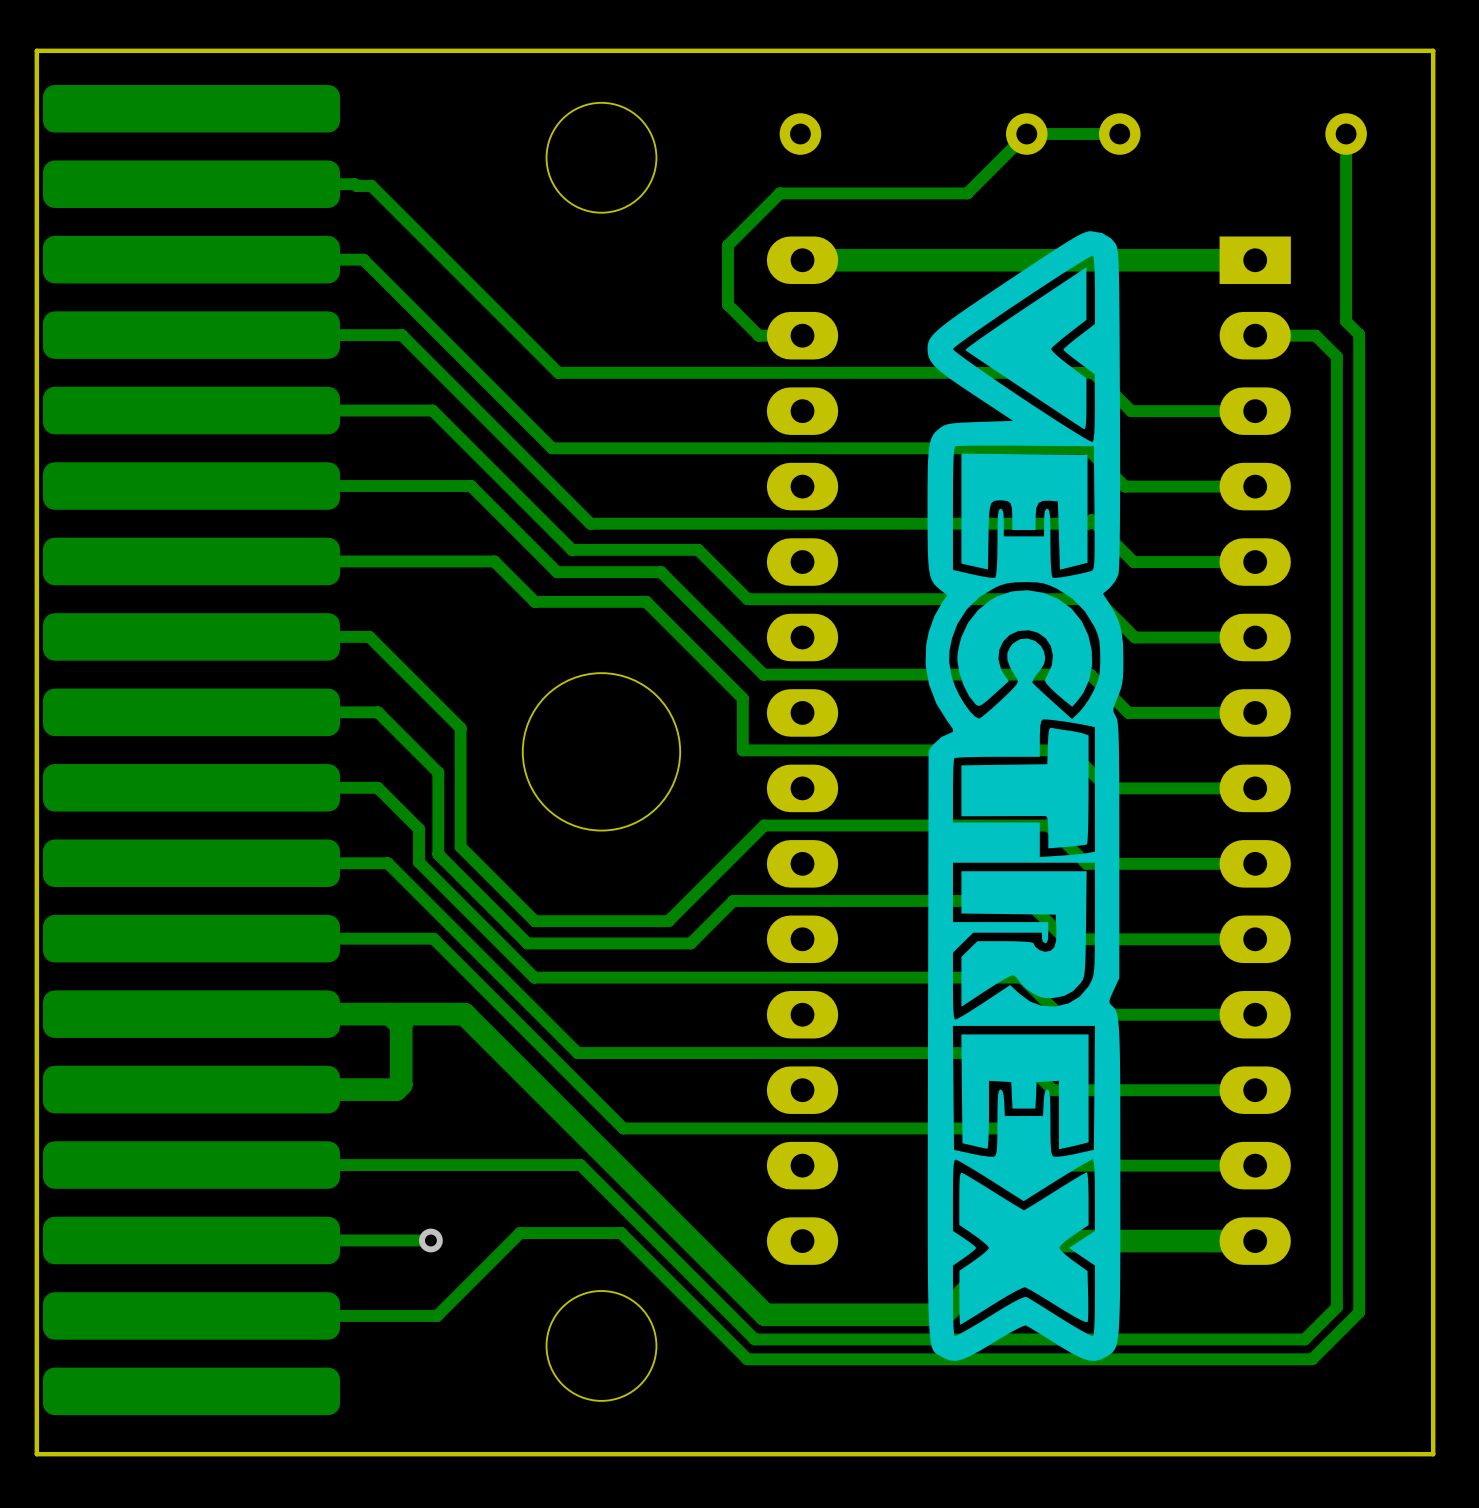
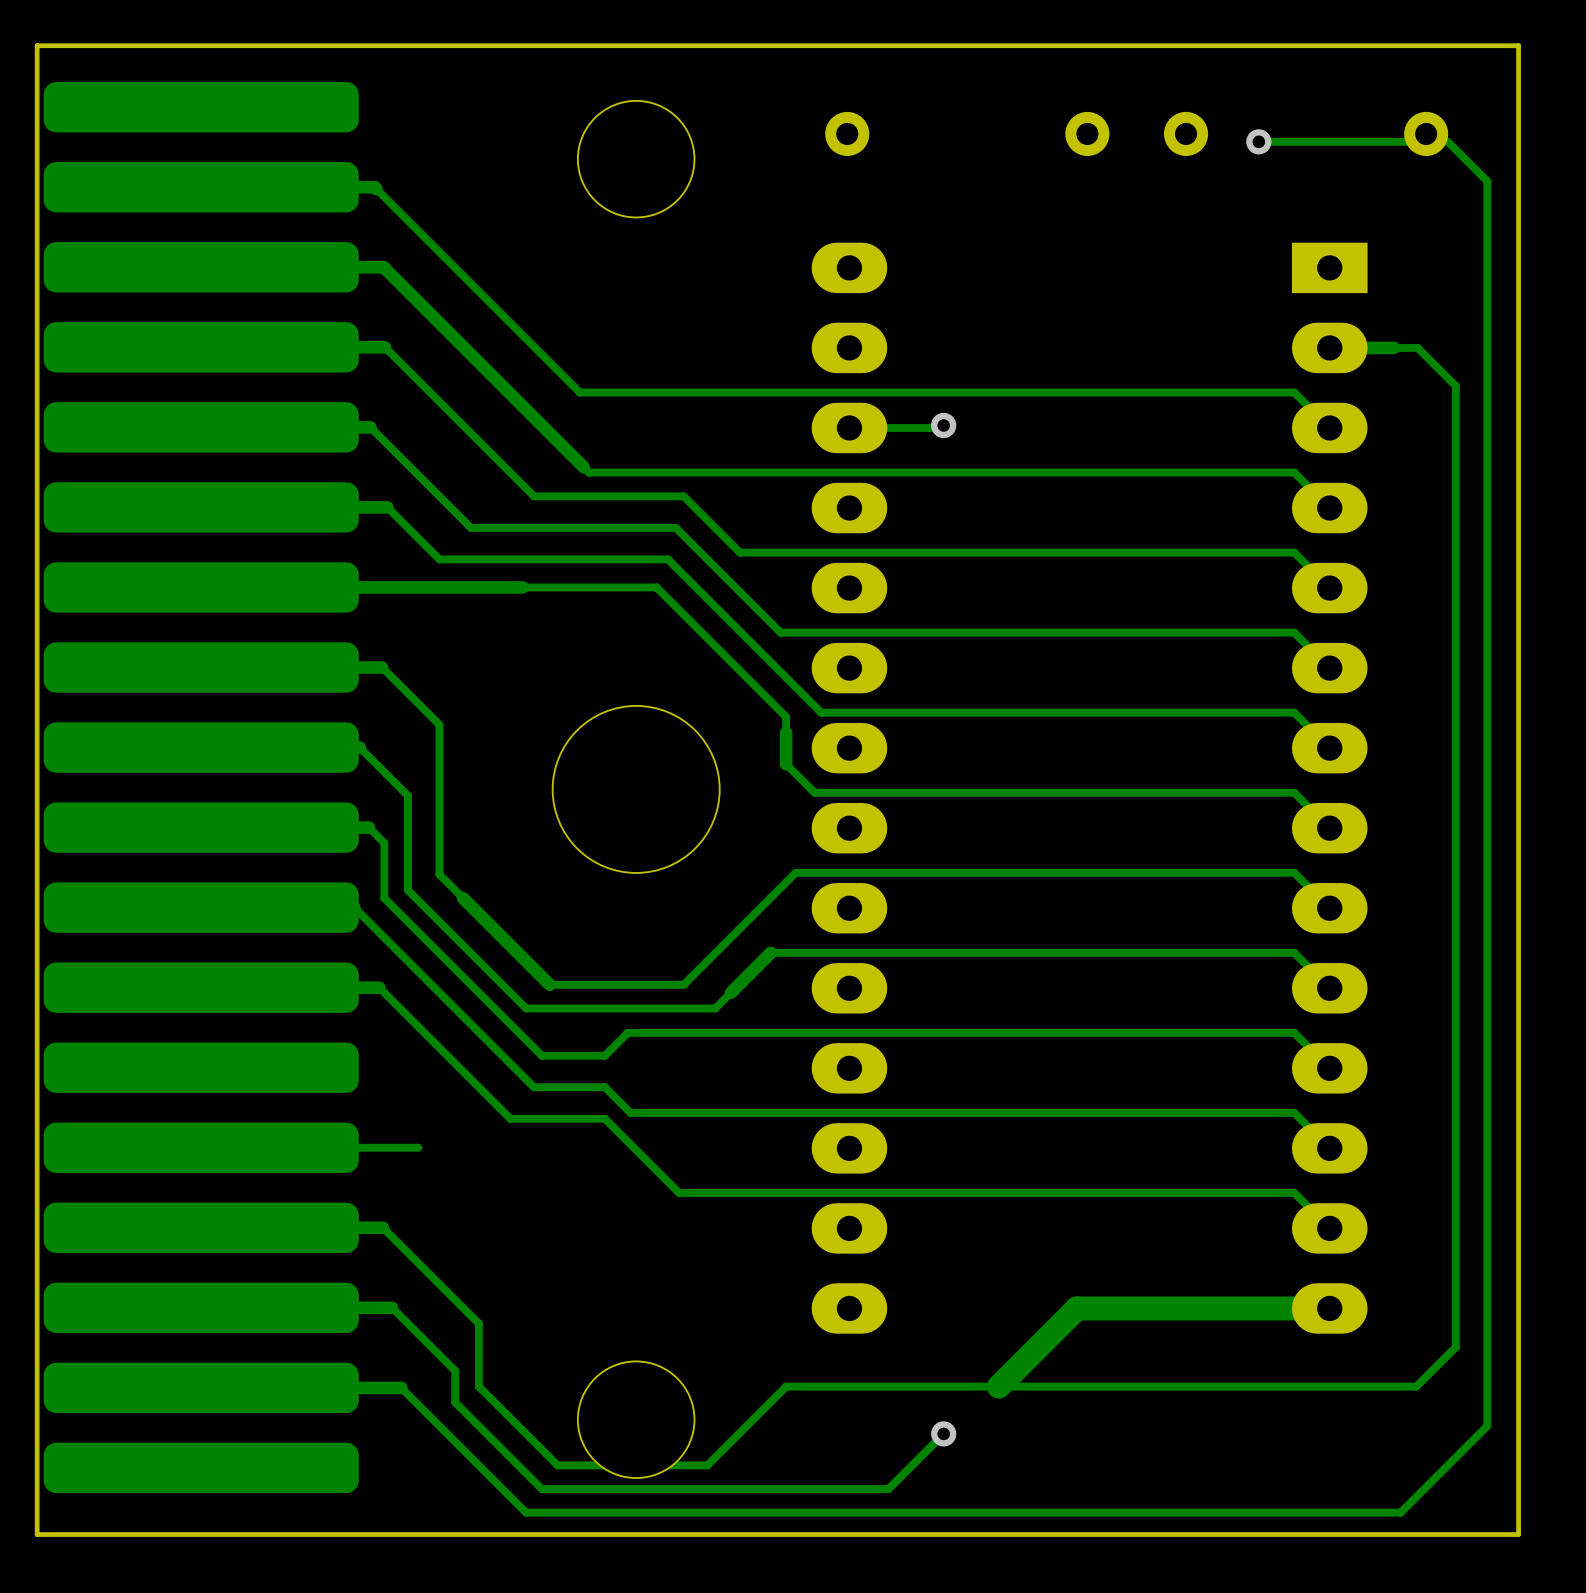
track: (1119, 134) (1026, 134) (967, 193) (779, 193) (727, 245) (727, 304) (758, 335) (802, 335) -> none
track: (1346, 134) (1346, 321) (1359, 334) (1359, 1312) (1312, 1359) (747, 1359) (621, 1233) (520, 1233) (437, 1315) (380, 1315) -> (1258, 141) (1447, 141) (1487, 181) (1487, 1426) (1400, 1512) (526, 1512) (401, 1387)
via: none -> (1258, 141)
track: (356, 185) (371, 185) (558, 372) (1093, 372) (1131, 411) (1255, 411) -> (376, 189) (579, 392) (1294, 392) (1329, 427)
drawing: [925, 231, 1124, 1361] -> none
track: (1255, 260) (802, 260) -> none
track: (364, 335) (401, 335) (590, 523) (1088, 523) (1091, 520) (1133, 562) (1255, 562) -> (384, 347) (534, 496) (683, 496) (739, 552) (1294, 552) (1329, 588)
track: (1315, 335) (1336, 356) (1336, 1307) (1304, 1339) (754, 1339) (580, 1165) (362, 1165) -> (1394, 347) (1417, 347) (1455, 386) (1455, 1347) (1416, 1386) (998, 1386)
track: none -> (943, 425) (941, 427) (849, 427)
via: none -> (943, 425)
track: (351, 410) (432, 410) (572, 549) (698, 549) (747, 599) (1096, 599) (1134, 637) (1255, 637) -> (370, 427) (470, 527) (675, 527) (780, 632) (1294, 632) (1329, 668)
track: (552, 448) (1086, 448) (1125, 486) (1255, 486) -> (583, 467) (589, 472) (1294, 472) (1329, 508)
track: (367, 486) (471, 486) (557, 572) (661, 572) (763, 674) (1090, 674) (1128, 712) (1255, 712) -> (387, 507) (439, 559) (667, 559) (821, 712) (1294, 712) (1329, 748)
track: (494, 561) (534, 601) (646, 601) (742, 698) -> (522, 587) (656, 587) (786, 716) (786, 732)
track: (362, 636) (369, 636) (460, 728) (460, 846) (534, 921) (668, 921) (764, 825) (1048, 825) (1086, 863) (1255, 863) -> (549, 984) (683, 984) (795, 872) (1294, 872) (1329, 908)
track: (340, 712) (378, 712) (438, 772) (438, 854) -> (382, 667) (439, 724) (439, 874) (463, 898)
track: (742, 728) (742, 750) (1069, 750) (1107, 788) (1255, 788) -> (786, 764) (814, 792) (1294, 792) (1329, 828)
track: (349, 787) (377, 787) (419, 829) (419, 862) (534, 977) (1022, 977) (1059, 1014) (1255, 1014) -> (368, 827) (384, 843) (384, 898) (541, 1055) (604, 1055) (627, 1032) (1294, 1032) (1329, 1068)
track: (335, 863) (387, 863) (577, 1053) (1015, 1053) (1052, 1090) (1255, 1090) -> (354, 907) (534, 1087) (604, 1087) (630, 1112) (1294, 1112) (1329, 1148)
track: (728, 905) (733, 900) (1027, 900) (1065, 939) (1255, 939) -> (770, 952) (1294, 952) (1329, 988)
track: (520, 936) (527, 943) (690, 943) -> (359, 747) (407, 795) (407, 890) (526, 1008) (715, 1008) (730, 992)
track: (359, 938) (433, 938) (623, 1128) (1002, 1128) (1039, 1165) (1255, 1165) -> (379, 987) (510, 1118) (604, 1118) (679, 1192) (1294, 1192) (1329, 1228)
track: (310, 1014) (464, 1014) (765, 1314) -> (383, 1227) (478, 1323) (478, 1386) (557, 1465) (707, 1465) (786, 1386) (809, 1386)
track: (390, 1014) (401, 1025) (401, 1084) (396, 1089) -> none
track width: thick (396, 1089) (310, 1089) -> thin (418, 1147) (327, 1147)
track: (430, 1240) (371, 1240) -> (943, 1433) (888, 1489) (541, 1489) (455, 1402) (455, 1370) (392, 1307)
via: (430, 1240) -> none
track width: thick (943, 1314) (765, 1314) -> thin (998, 1386) (809, 1386)
via: none -> (943, 1433)

